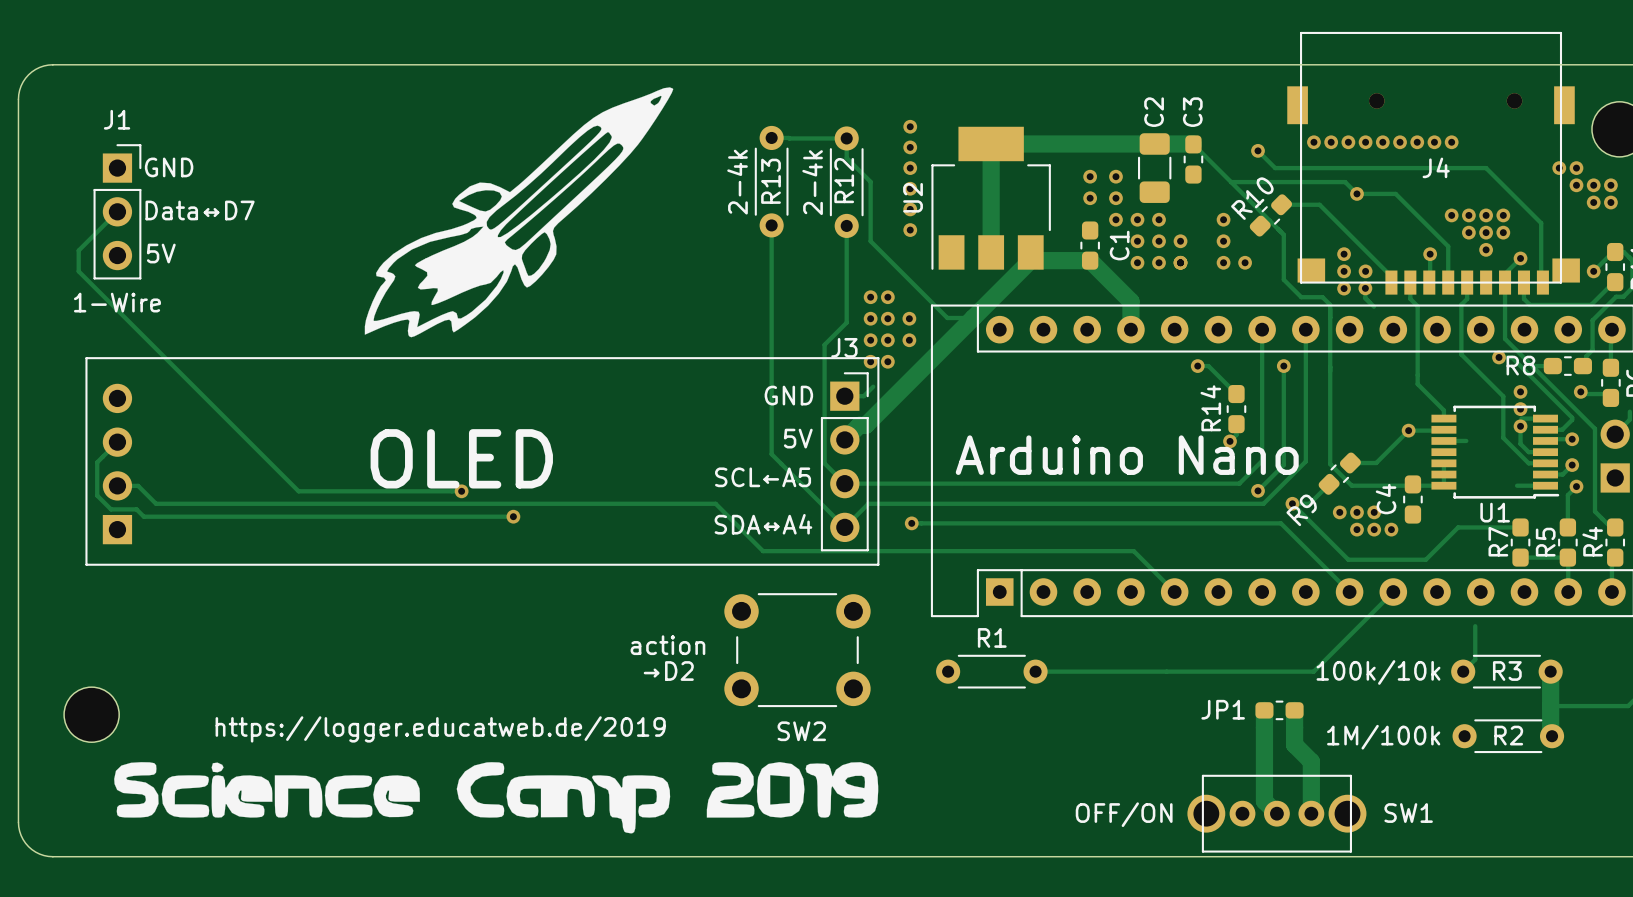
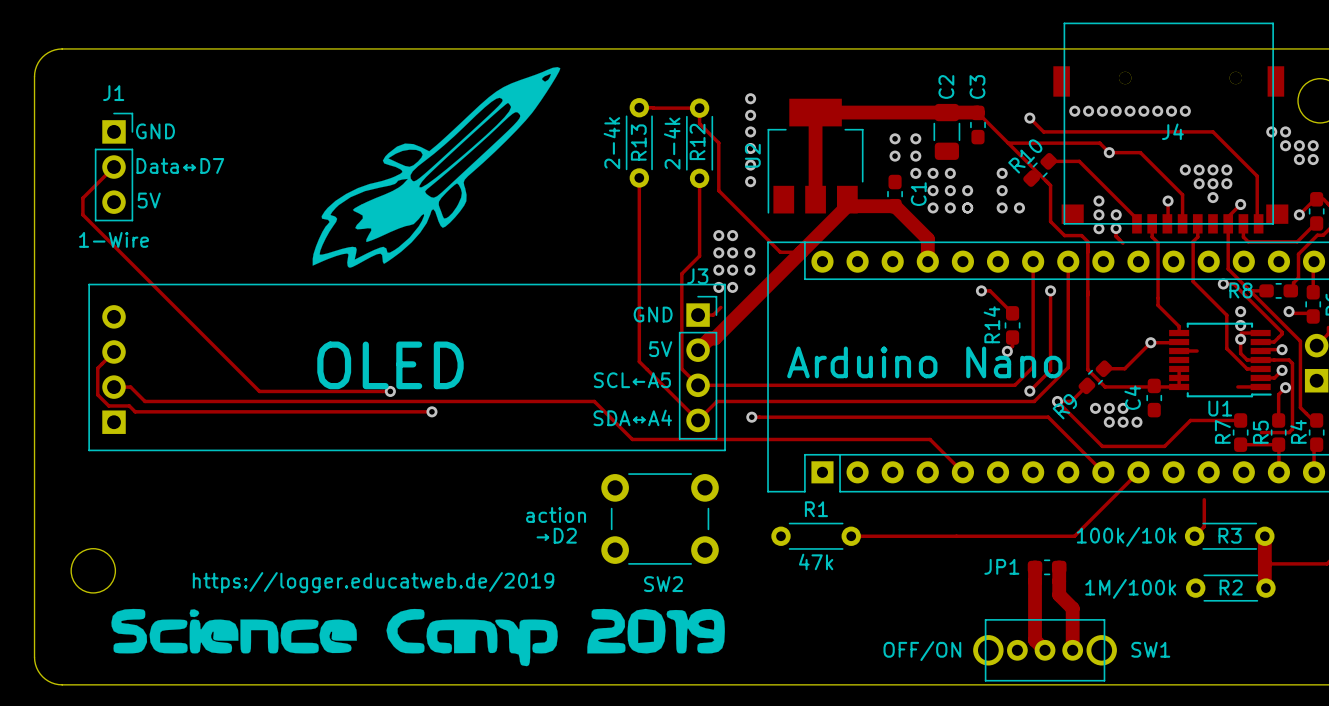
track: none -> (1260, 360) (1289, 360) (1292, 363) (1292, 429) (1289, 432) (1261, 432)
R1 value: none -> 47k (816, 561)

